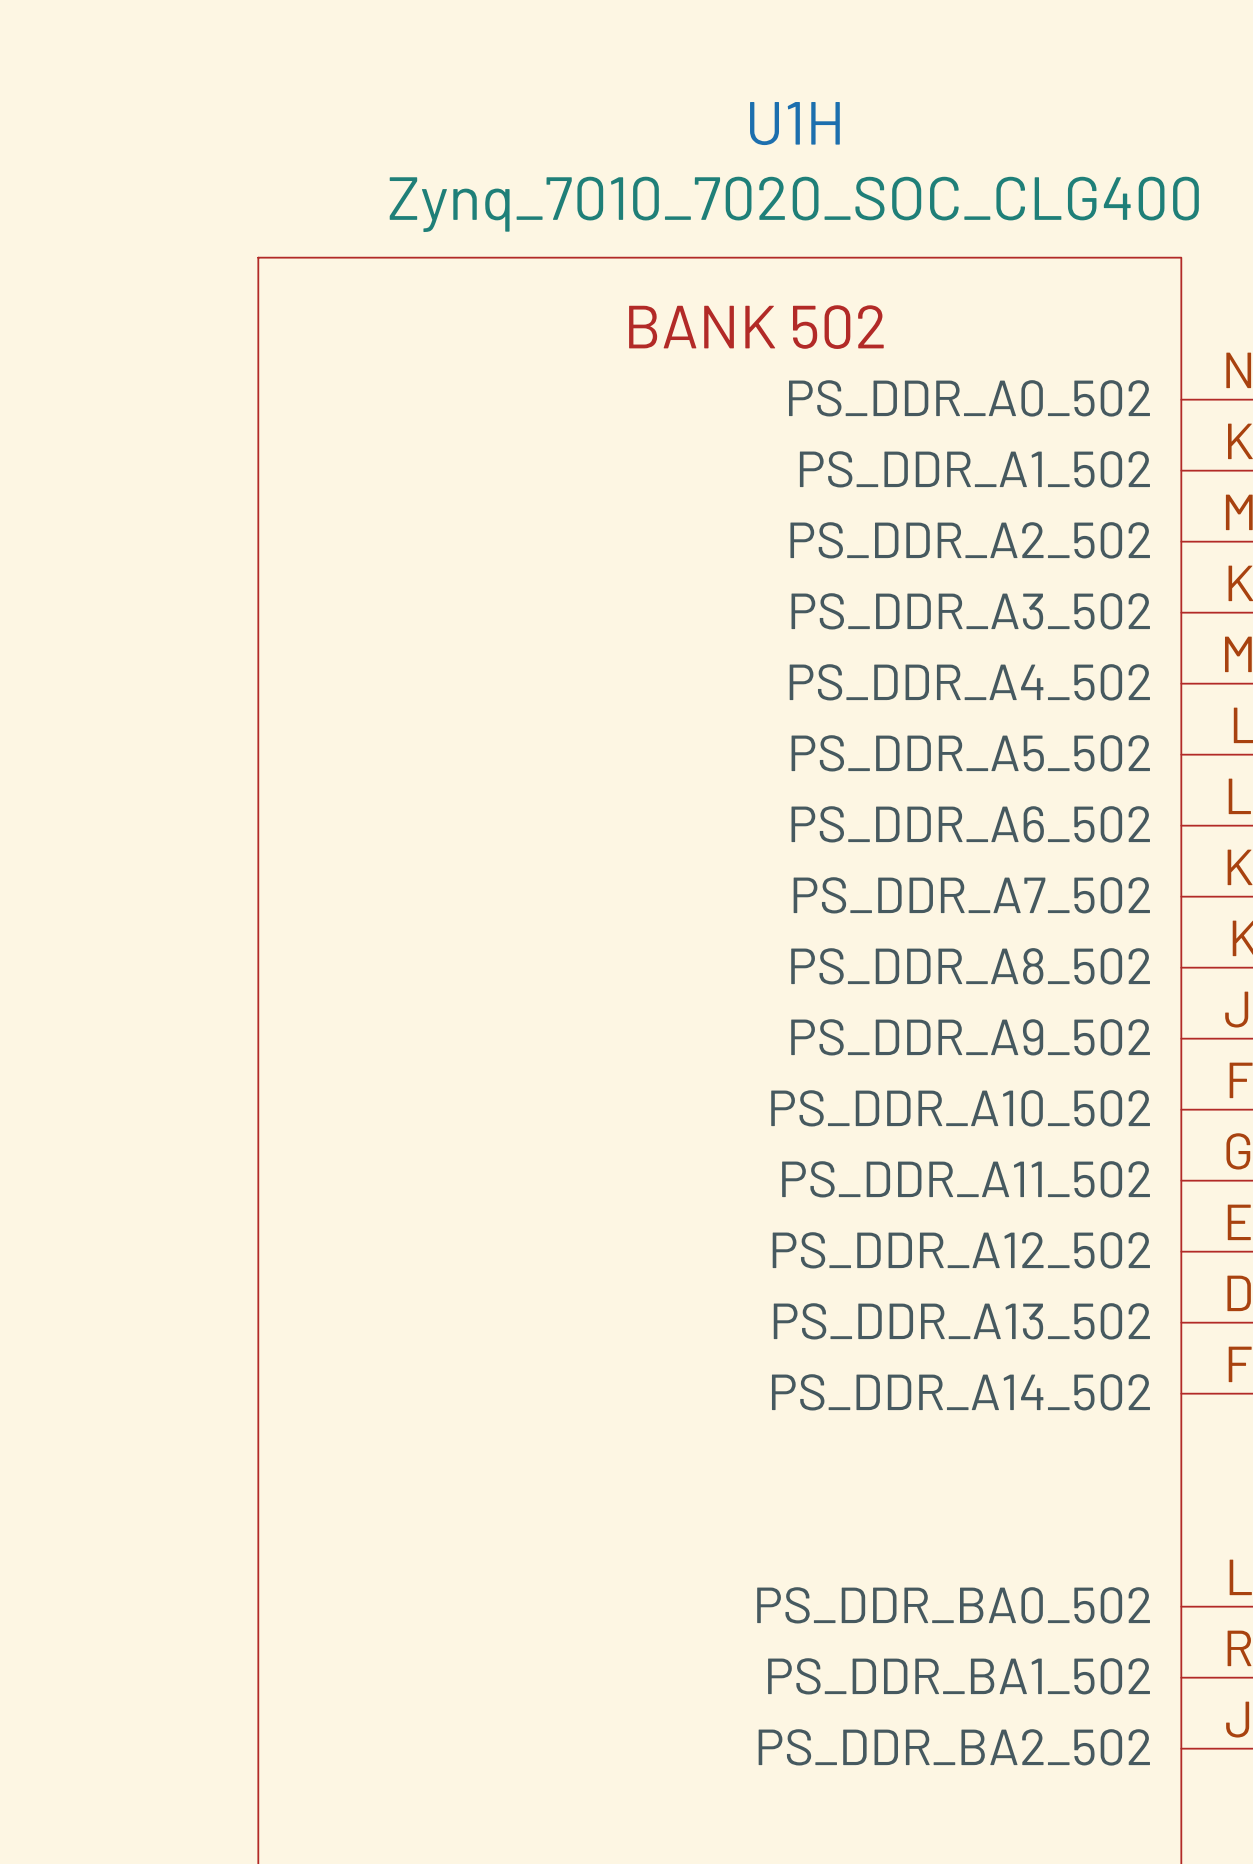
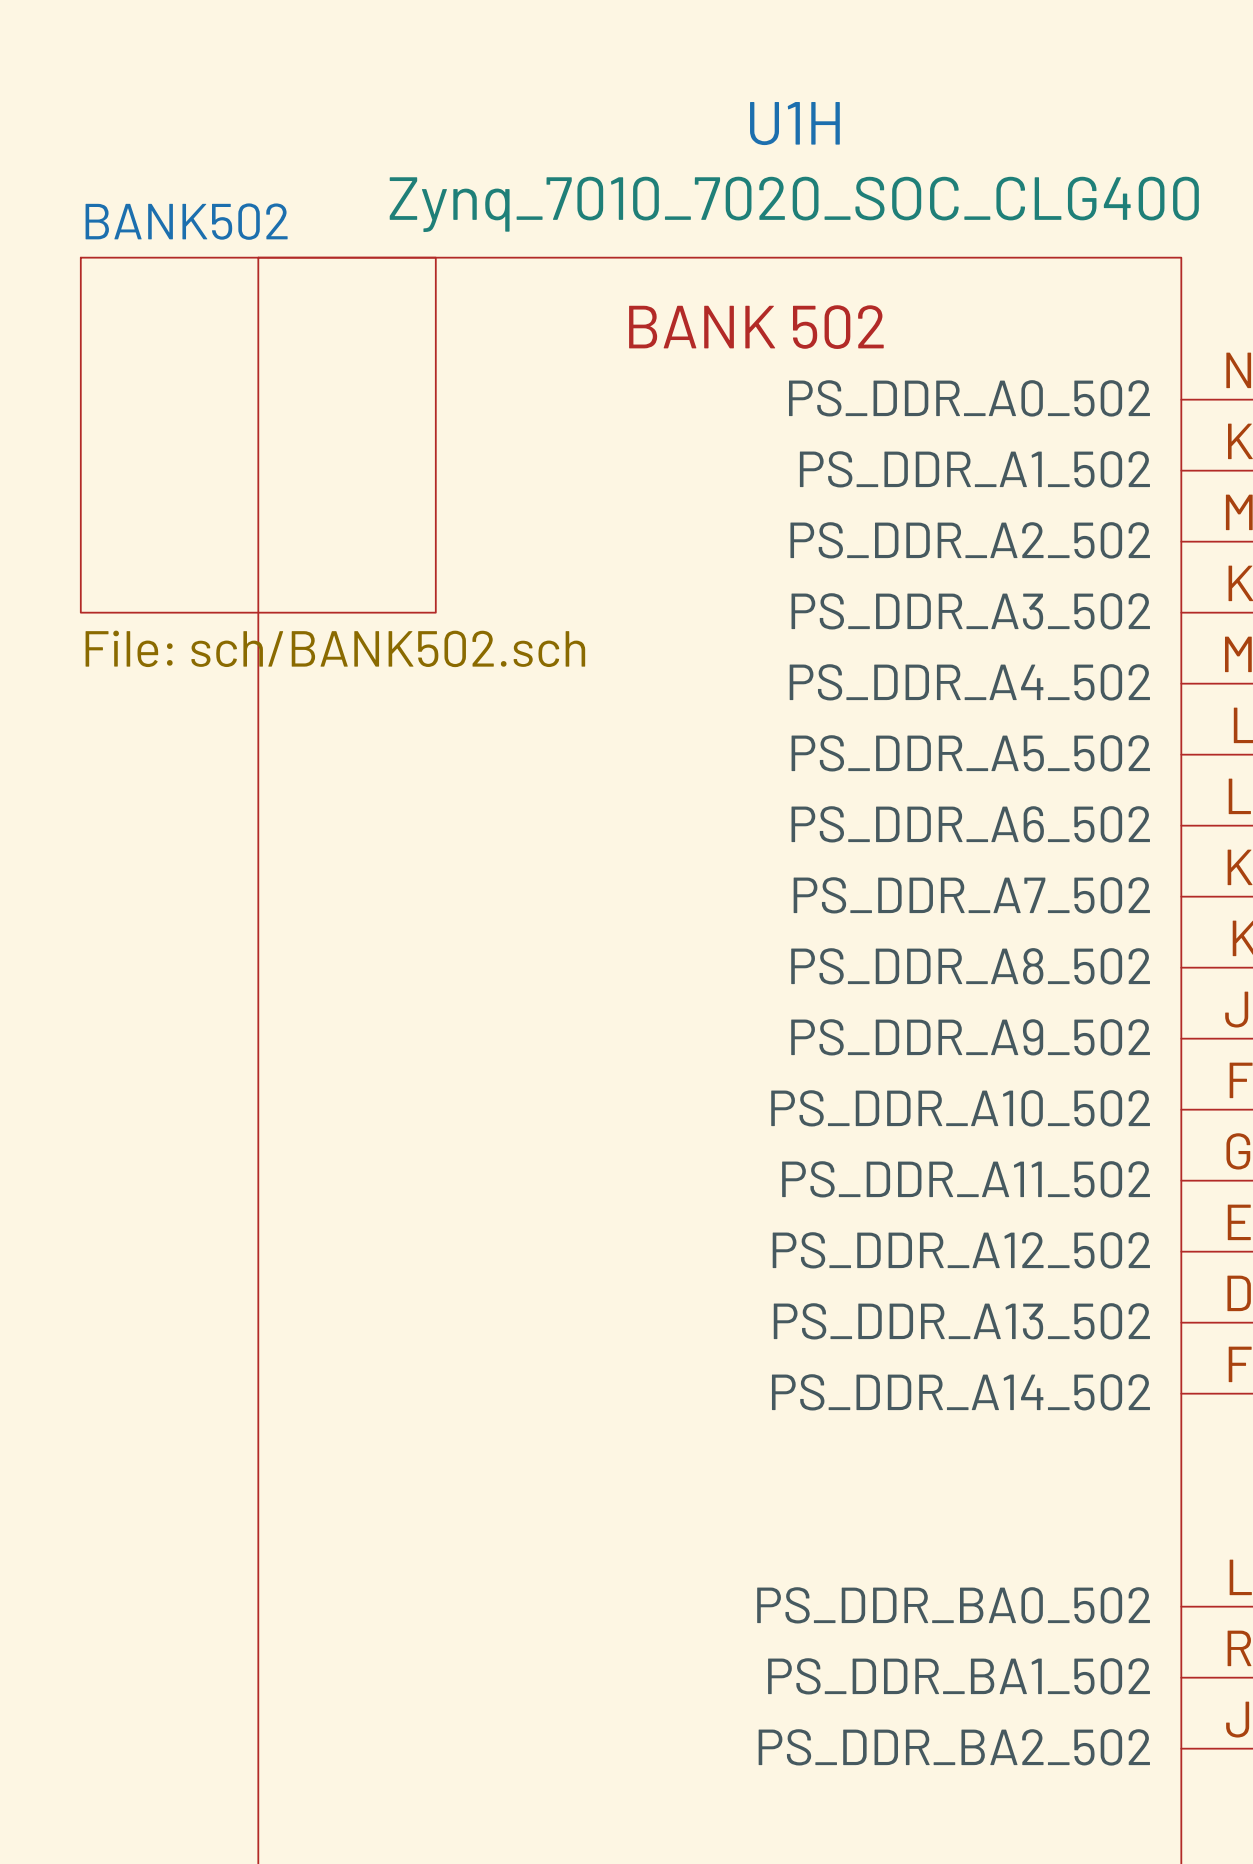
sheet BANK502: none -> File: sch/BANK502.sch (258, 435)

